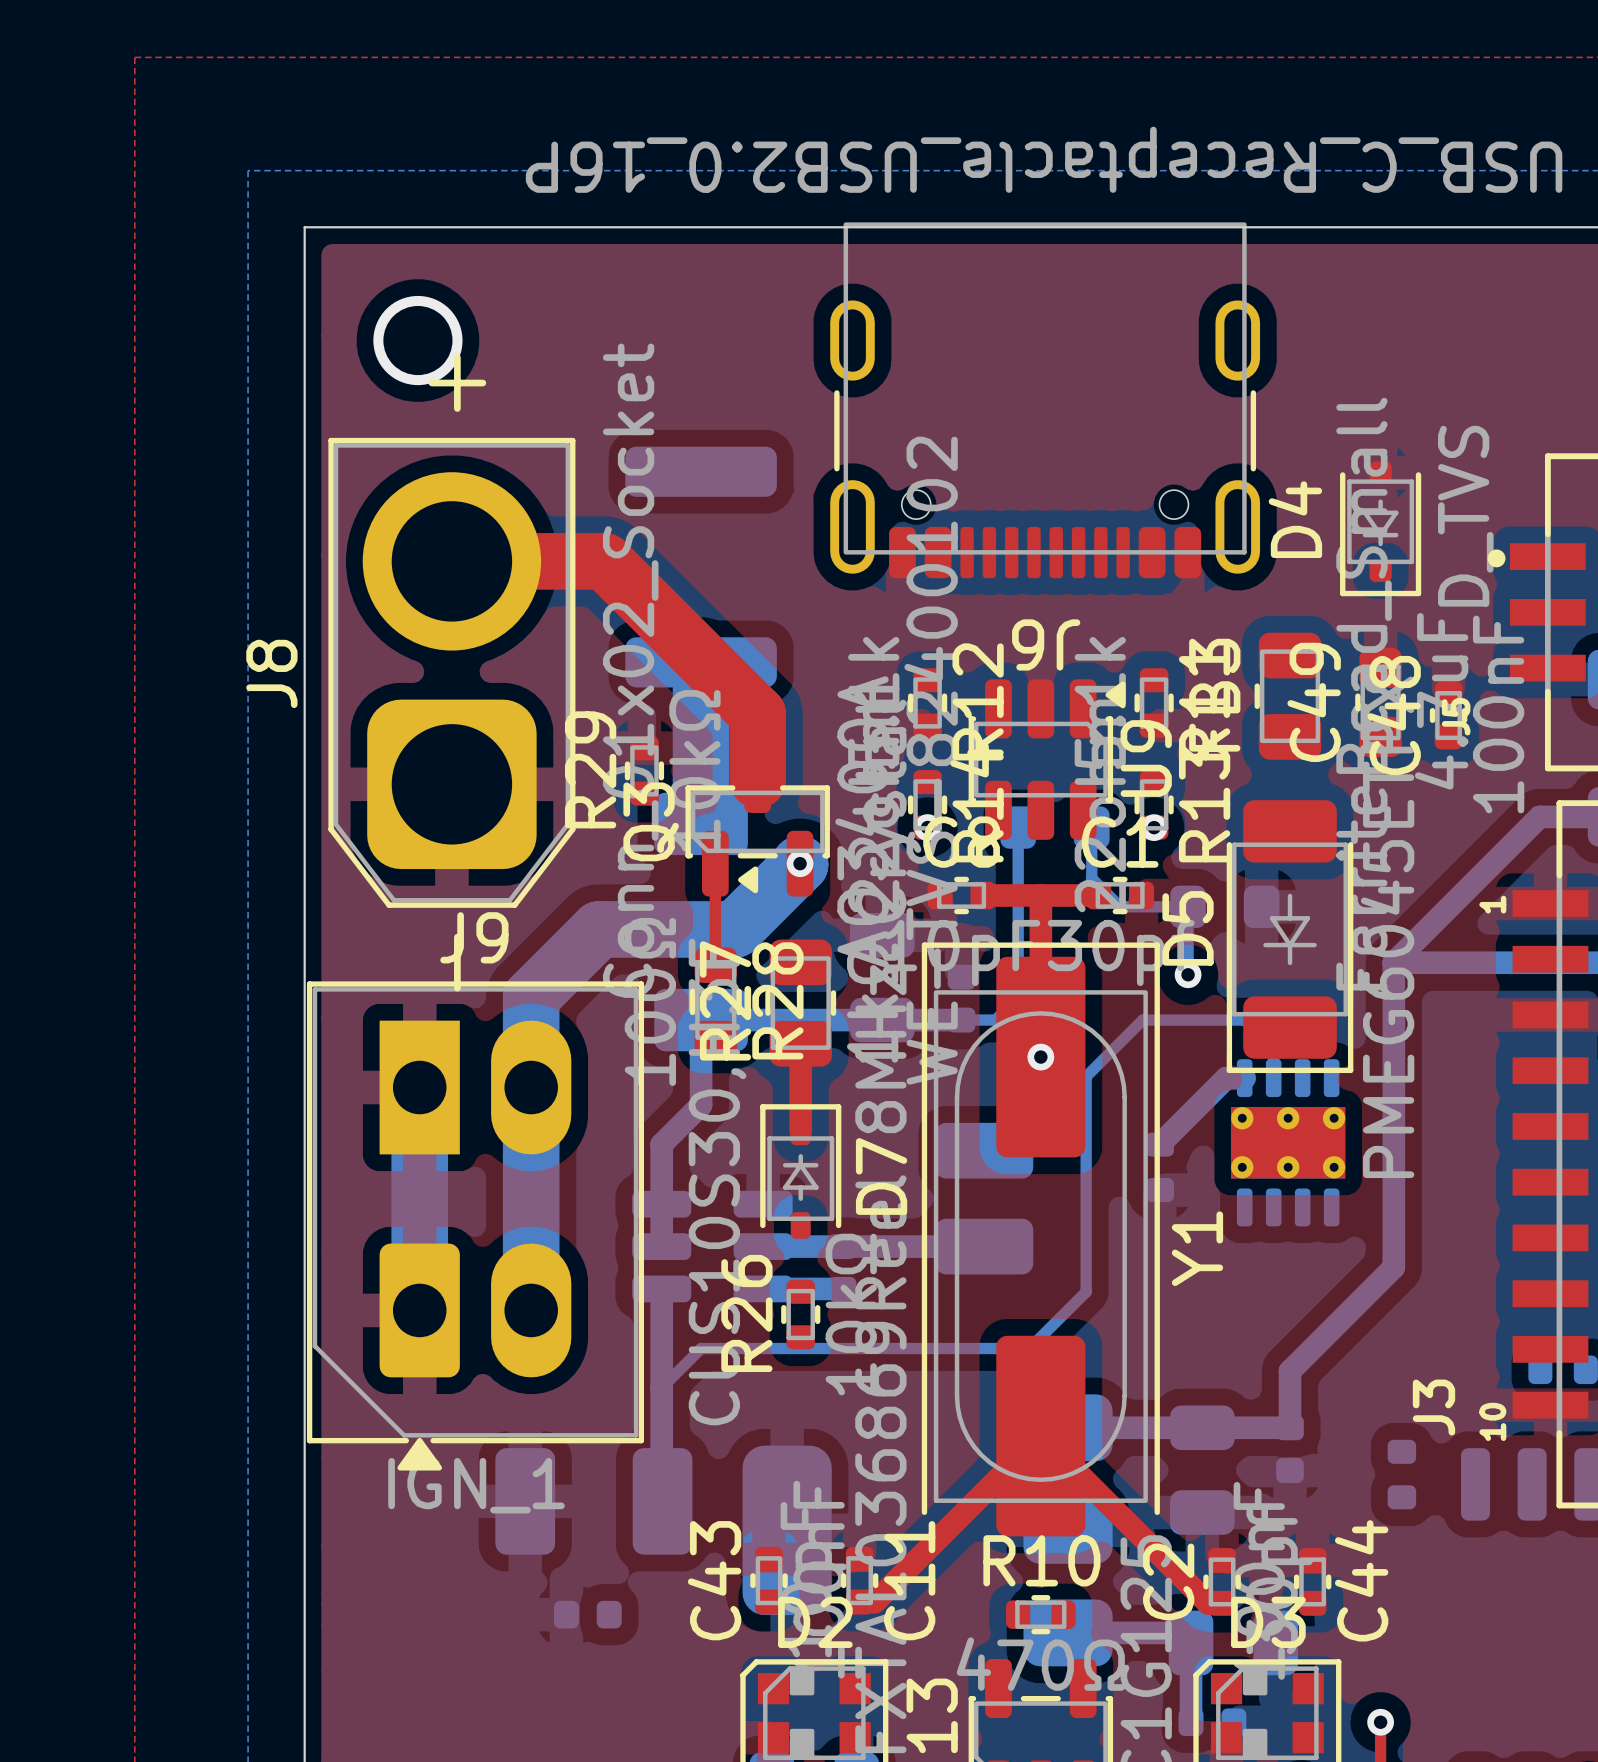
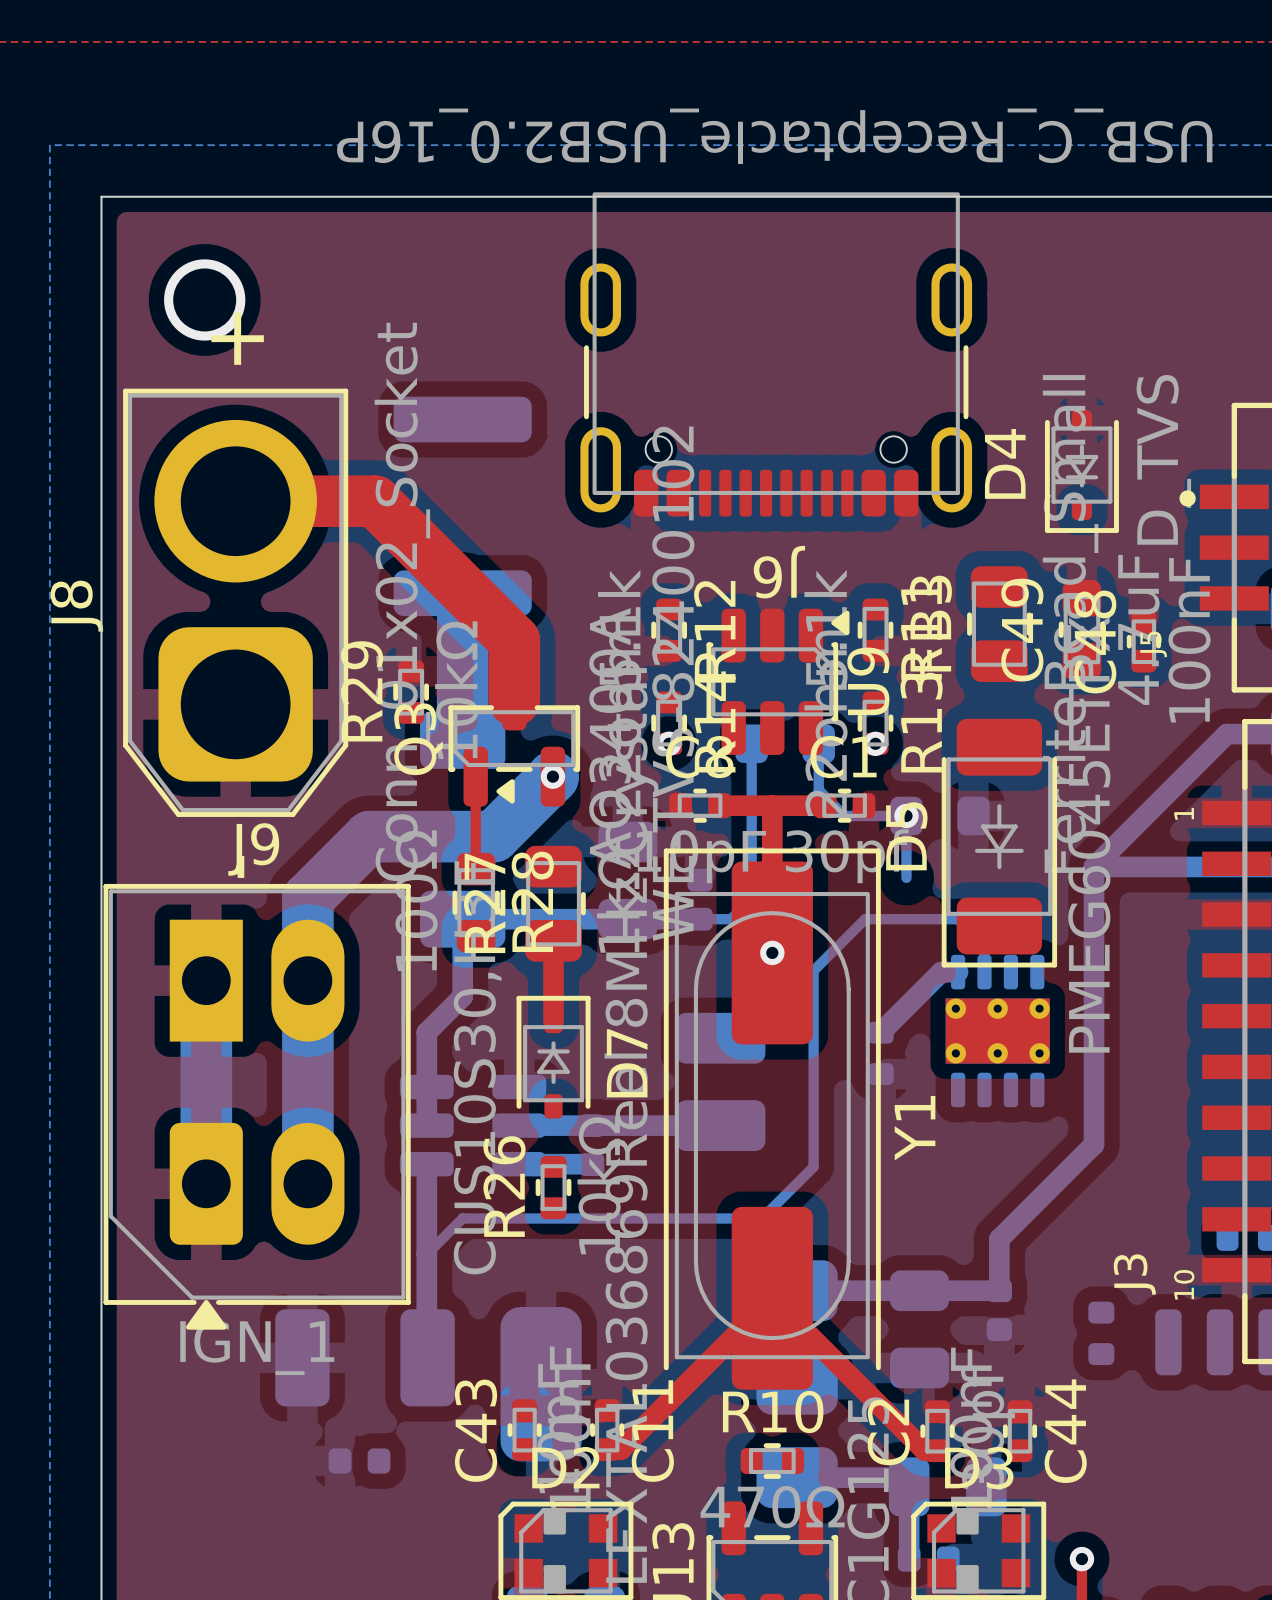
via position: (1188, 974) -> (906, 815)

